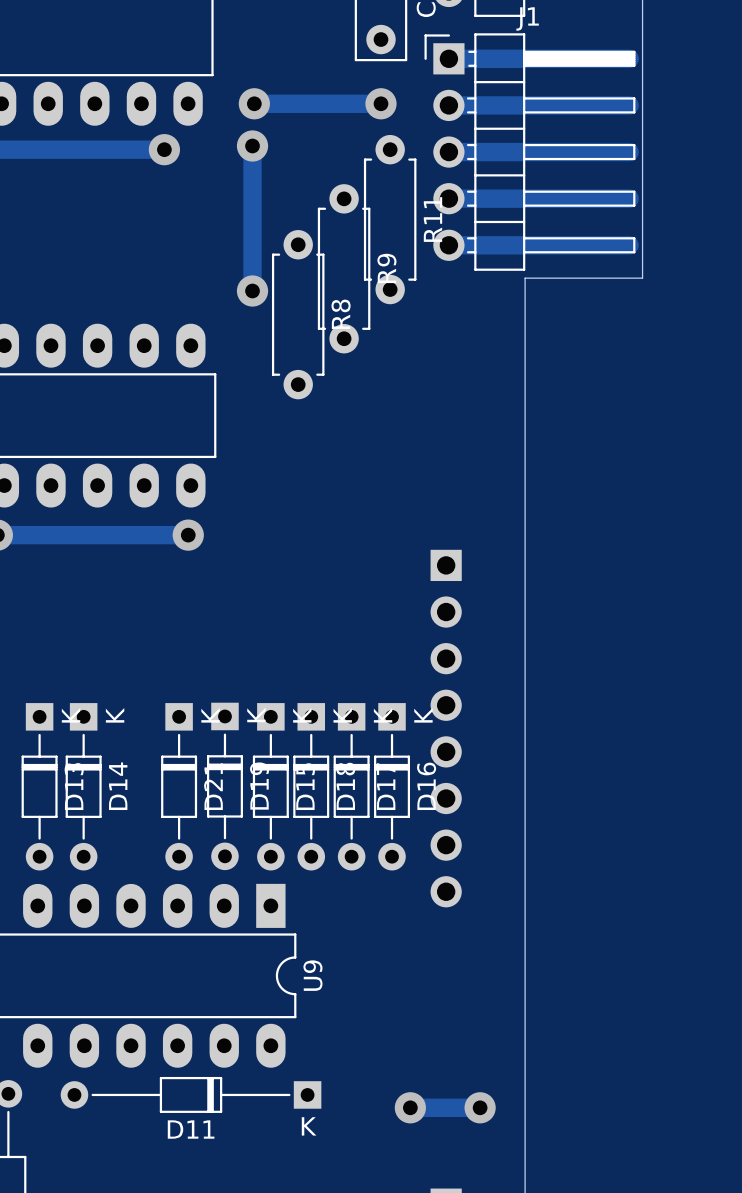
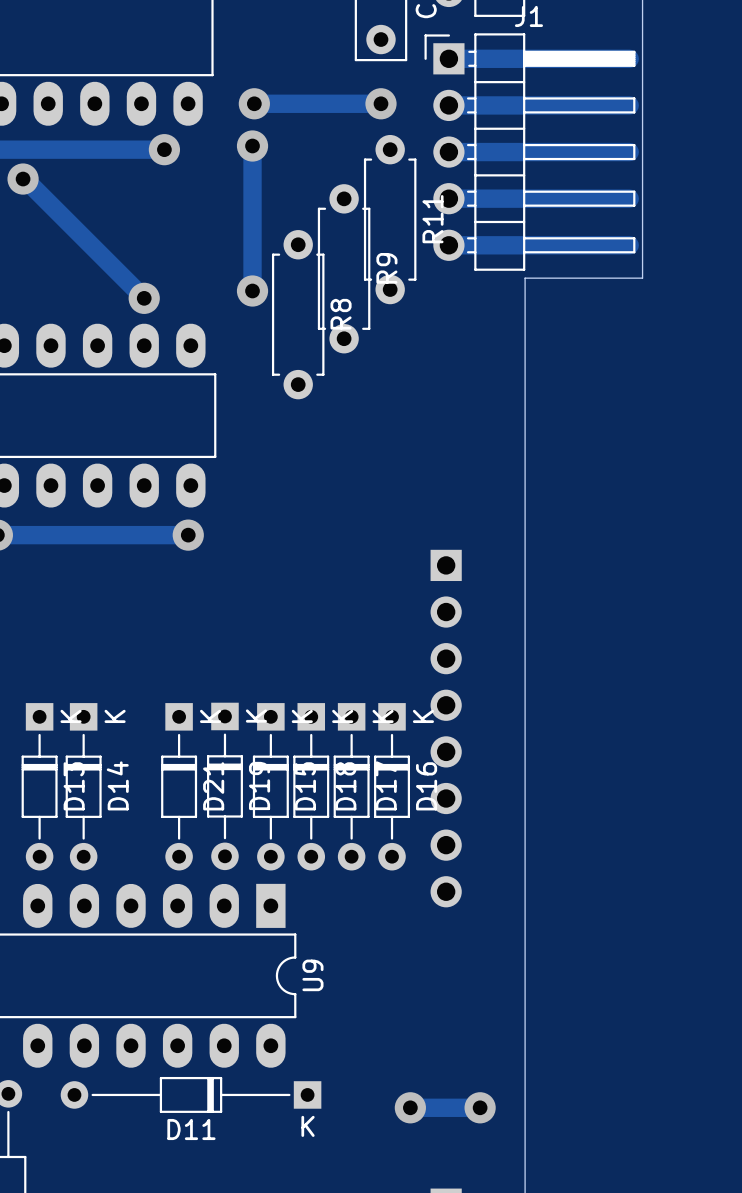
track: none -> (23, 179) (144, 298)
via: none -> (23, 179)
via: none -> (144, 298)

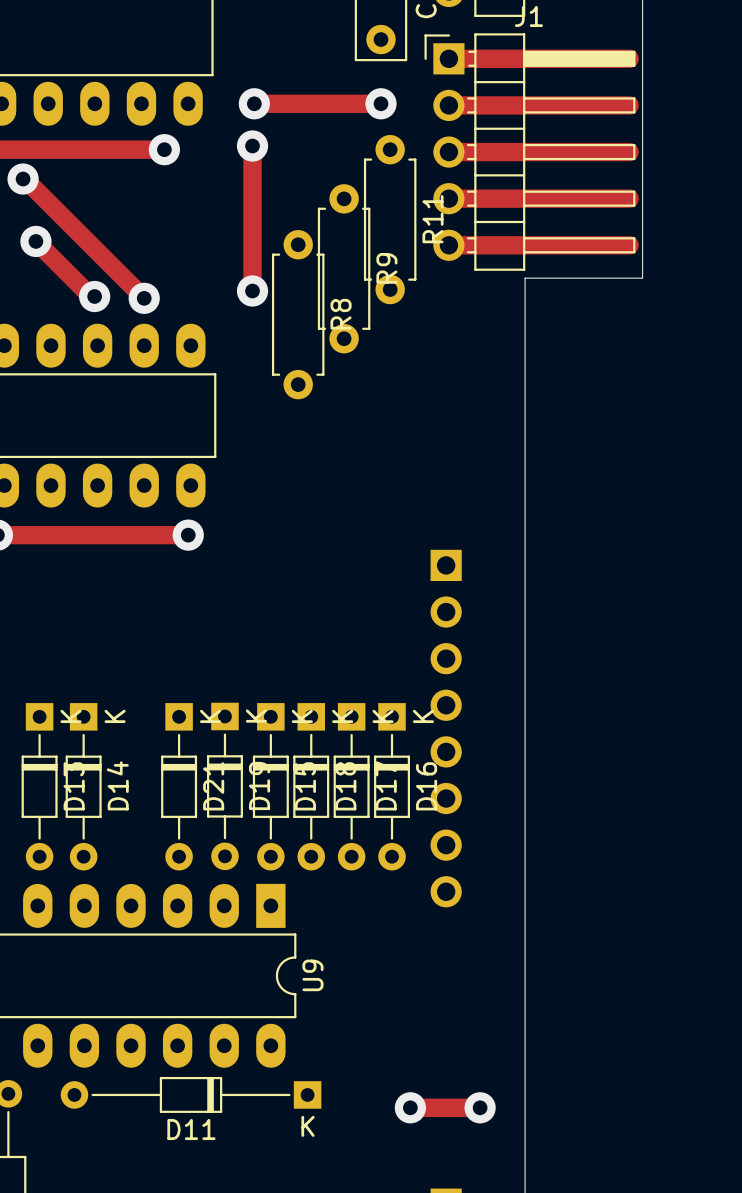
track: none -> (35, 241) (90, 296) (94, 296)
via: none -> (35, 241)
via: none -> (94, 296)

